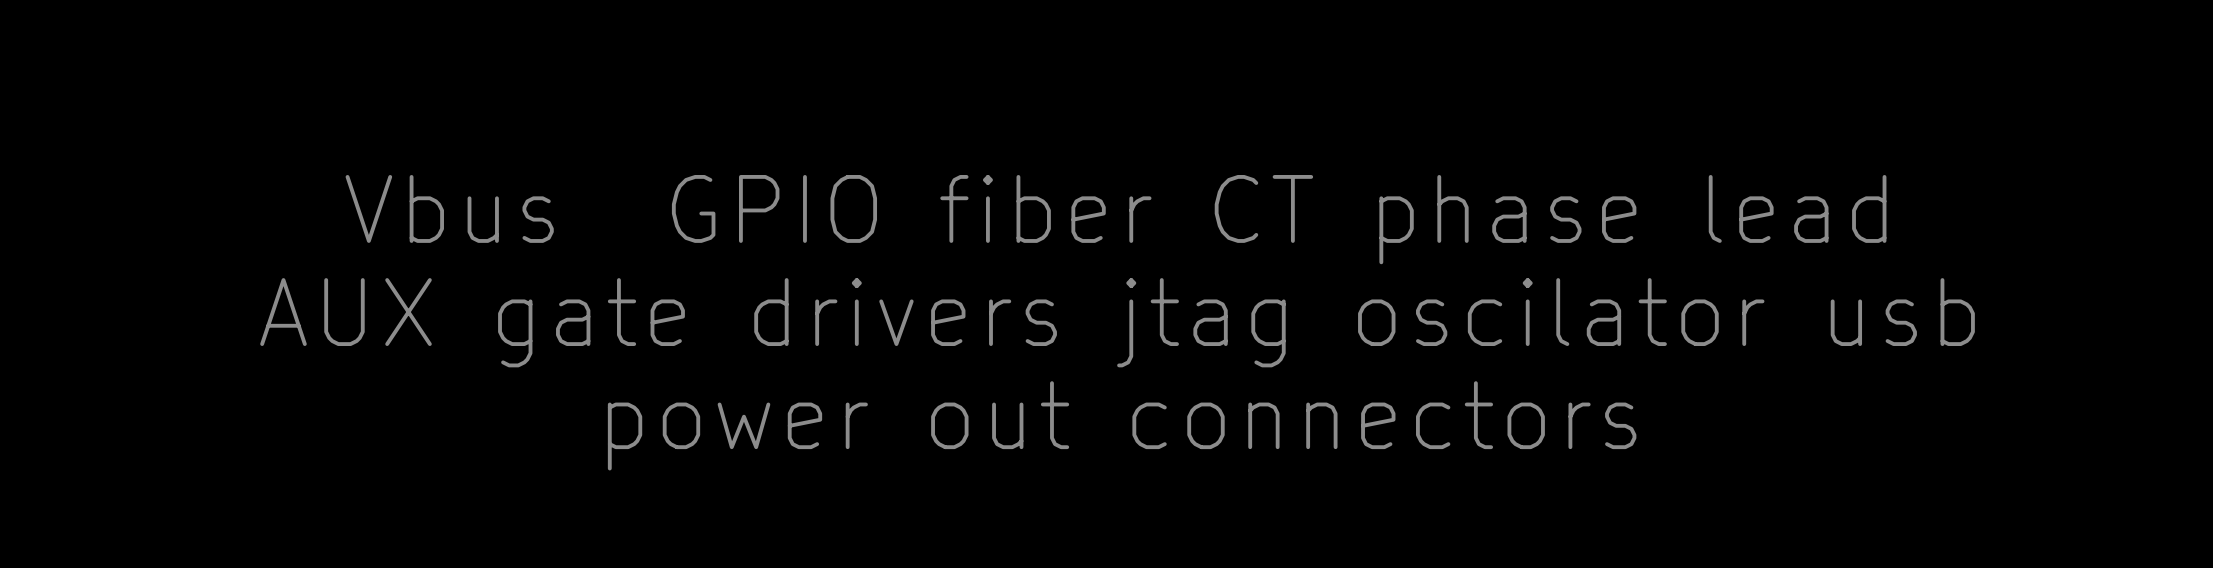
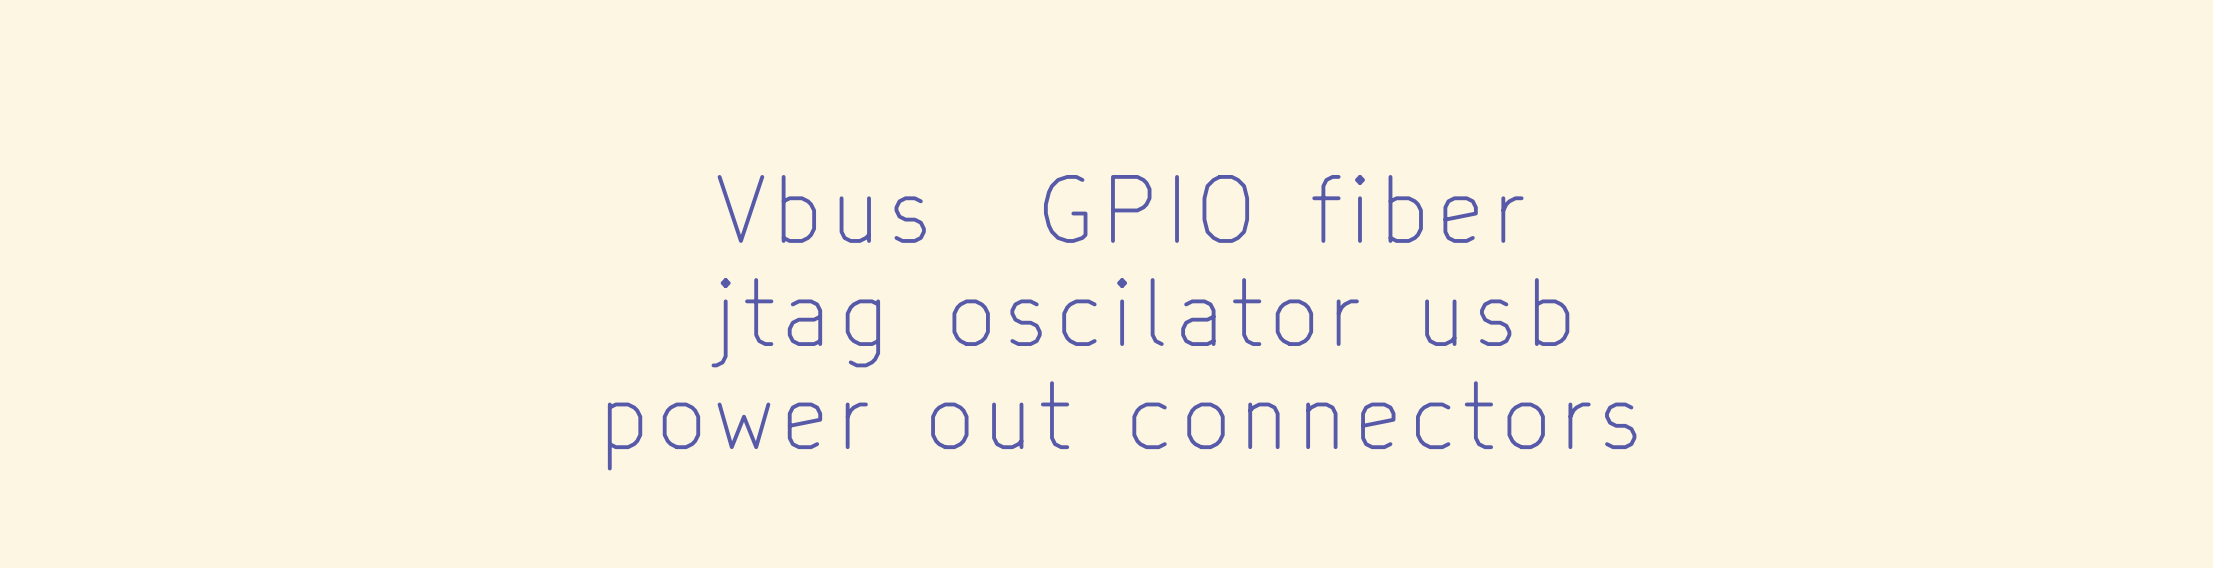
text: Vbus GPIO fiber CT phase lead (1116, 219) -> Vbus GPIO fiber (1120, 208)
text: AUX gate drivers jtag oscilator usb (1117, 322) -> jtag oscilator usb (1140, 322)

